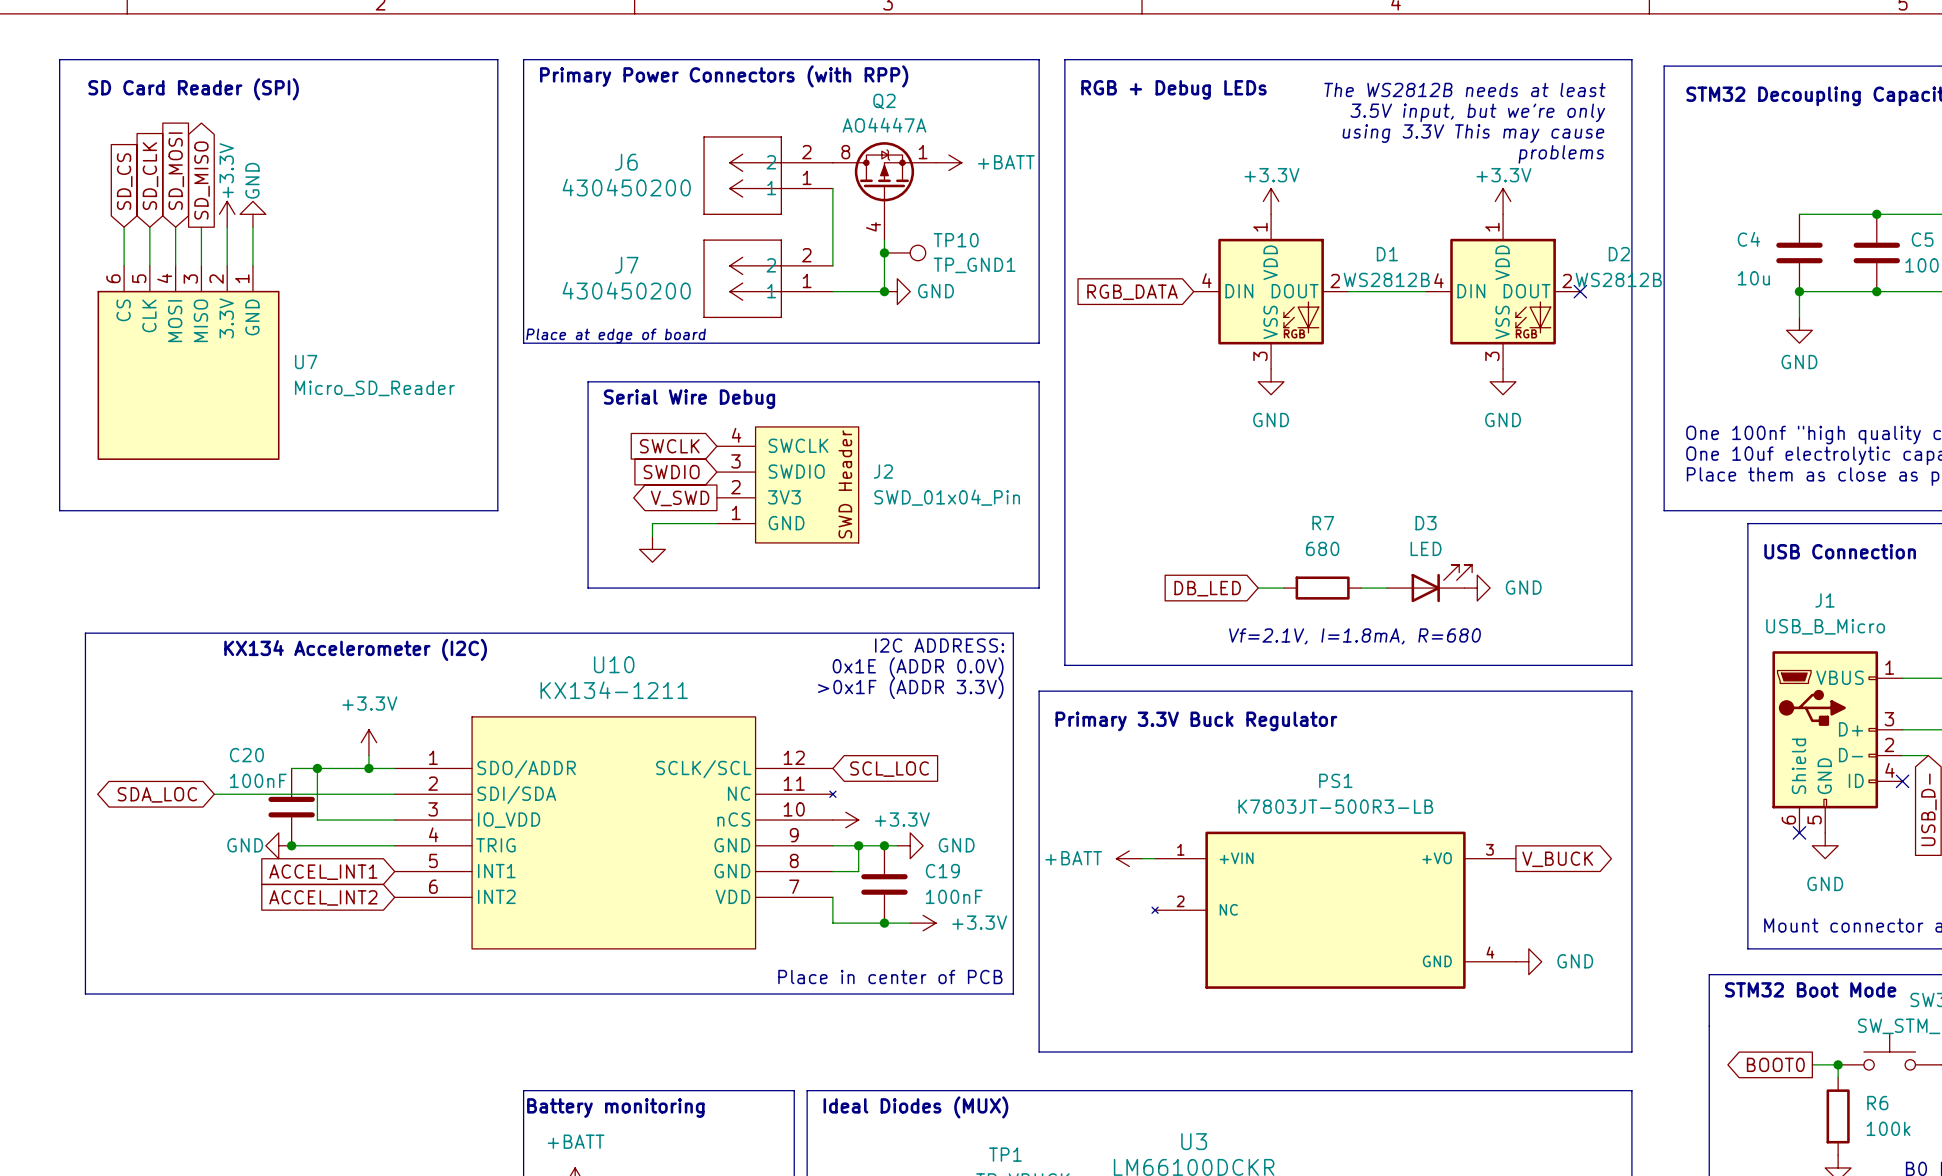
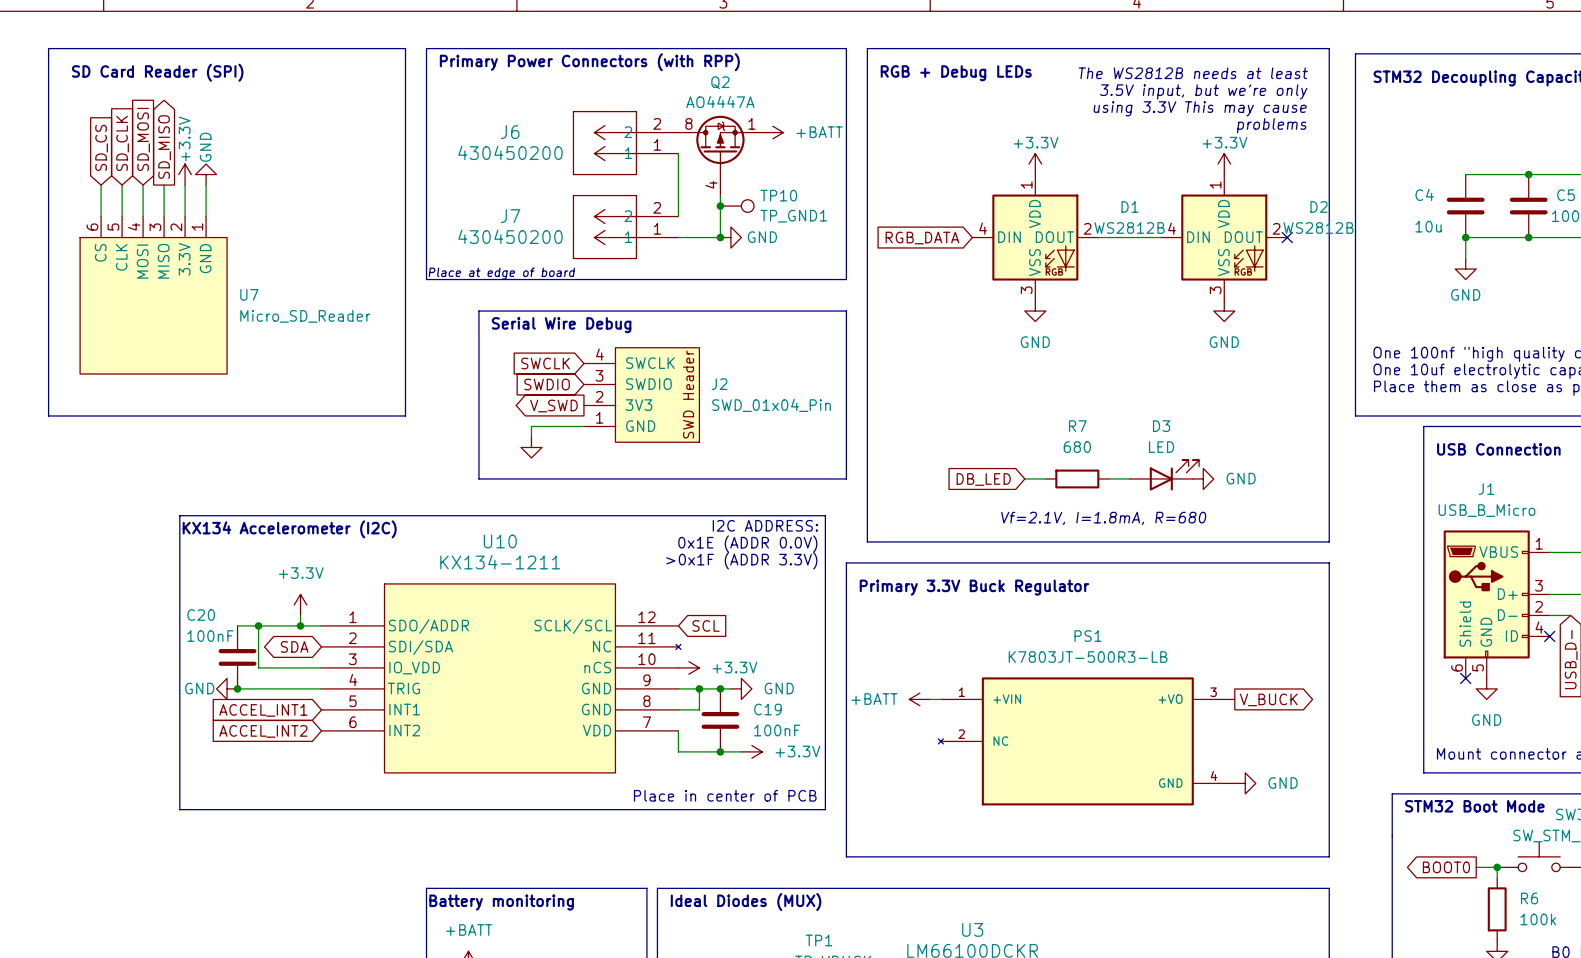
line: (220, 633) (85, 633) (85, 993) (220, 993) -> (179, 515) (179, 809)
global label: SCL_LOC (889, 769) -> SCL (706, 625)
global label: SDA_LOC (157, 794) -> none
wire: (214, 794) (394, 794) -> none
global label: none -> SDA (294, 646)

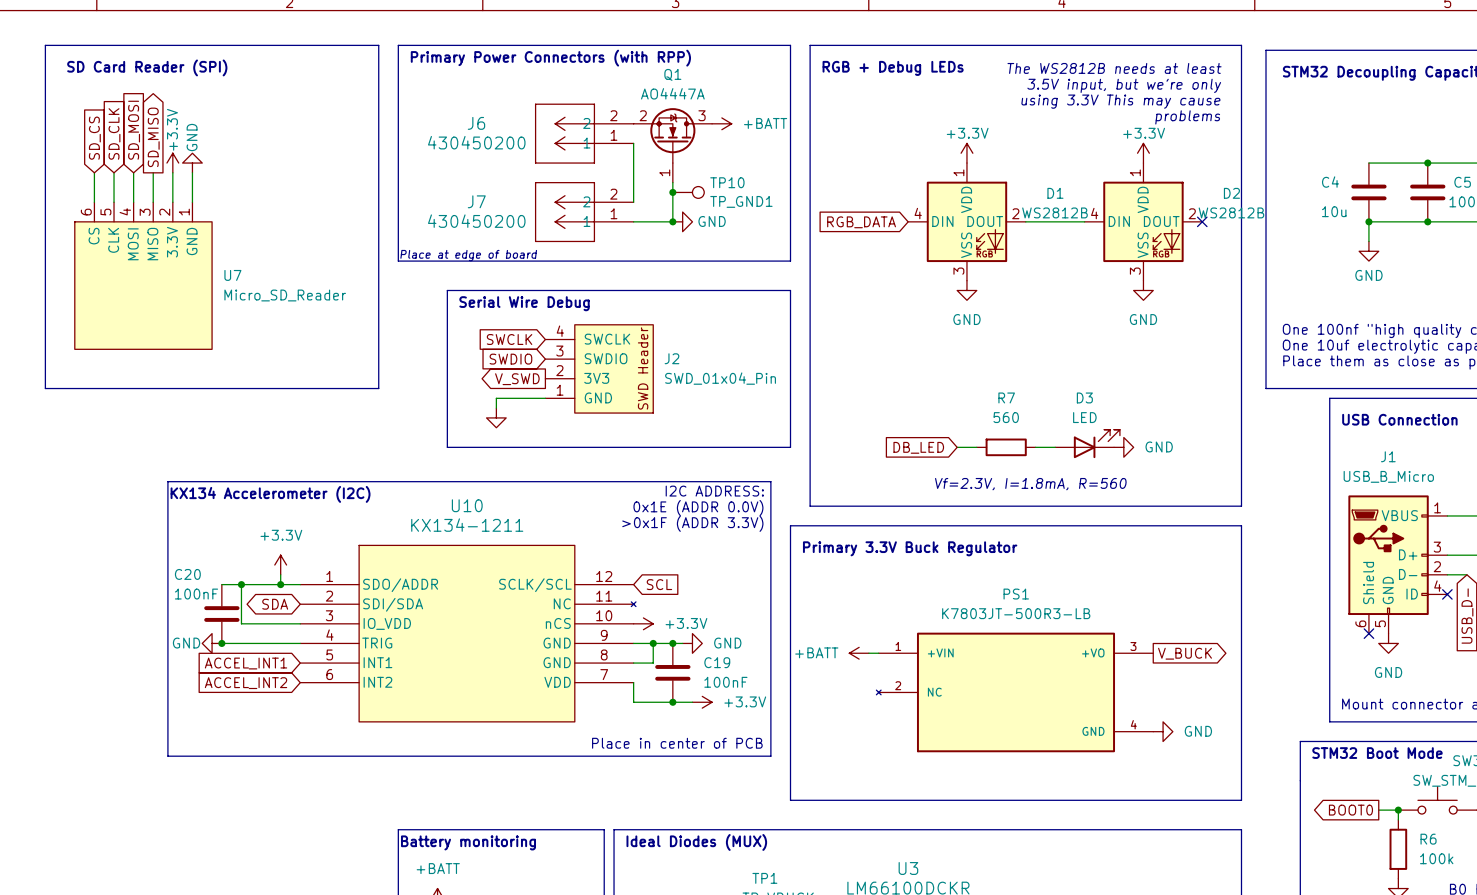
Q2: AO4447A (720, 155) -> none
Q1: none -> AO4447A (672, 145)
R7 value: 680 (1077, 447) -> 560 (1006, 417)
text: Vf=2.1V, I=1.8mA, R=680 (1103, 518) -> Vf=2.3V, I=1.8mA, R=560 (1030, 484)

